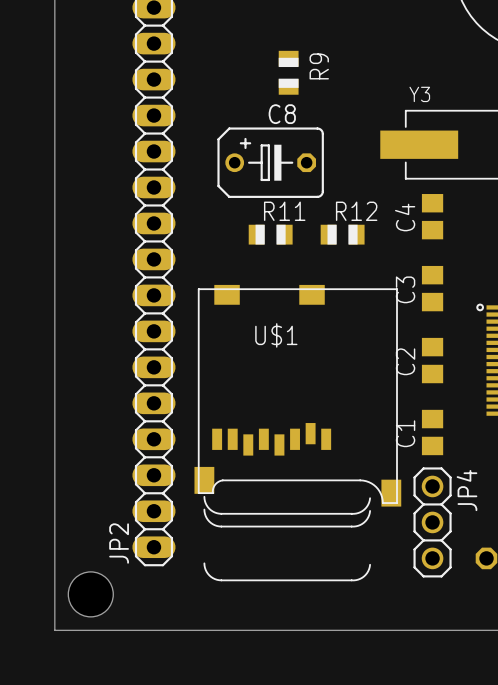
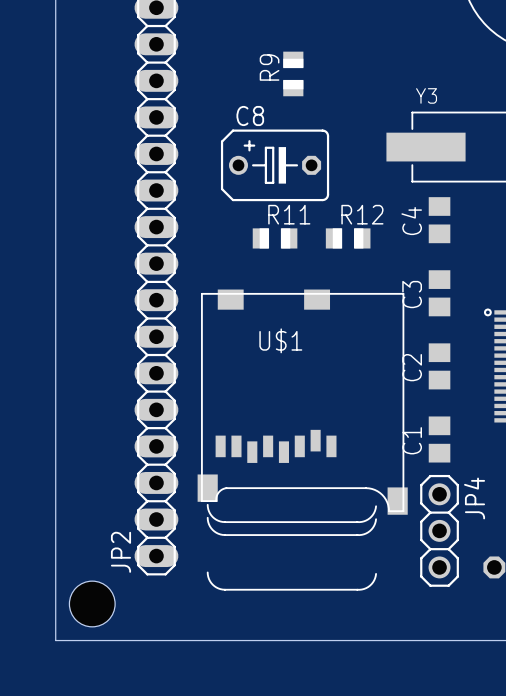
R9 name position: R9 (319, 66) -> R9 (269, 67)
C8 name position: C8 (282, 114) -> C8 (250, 115)

